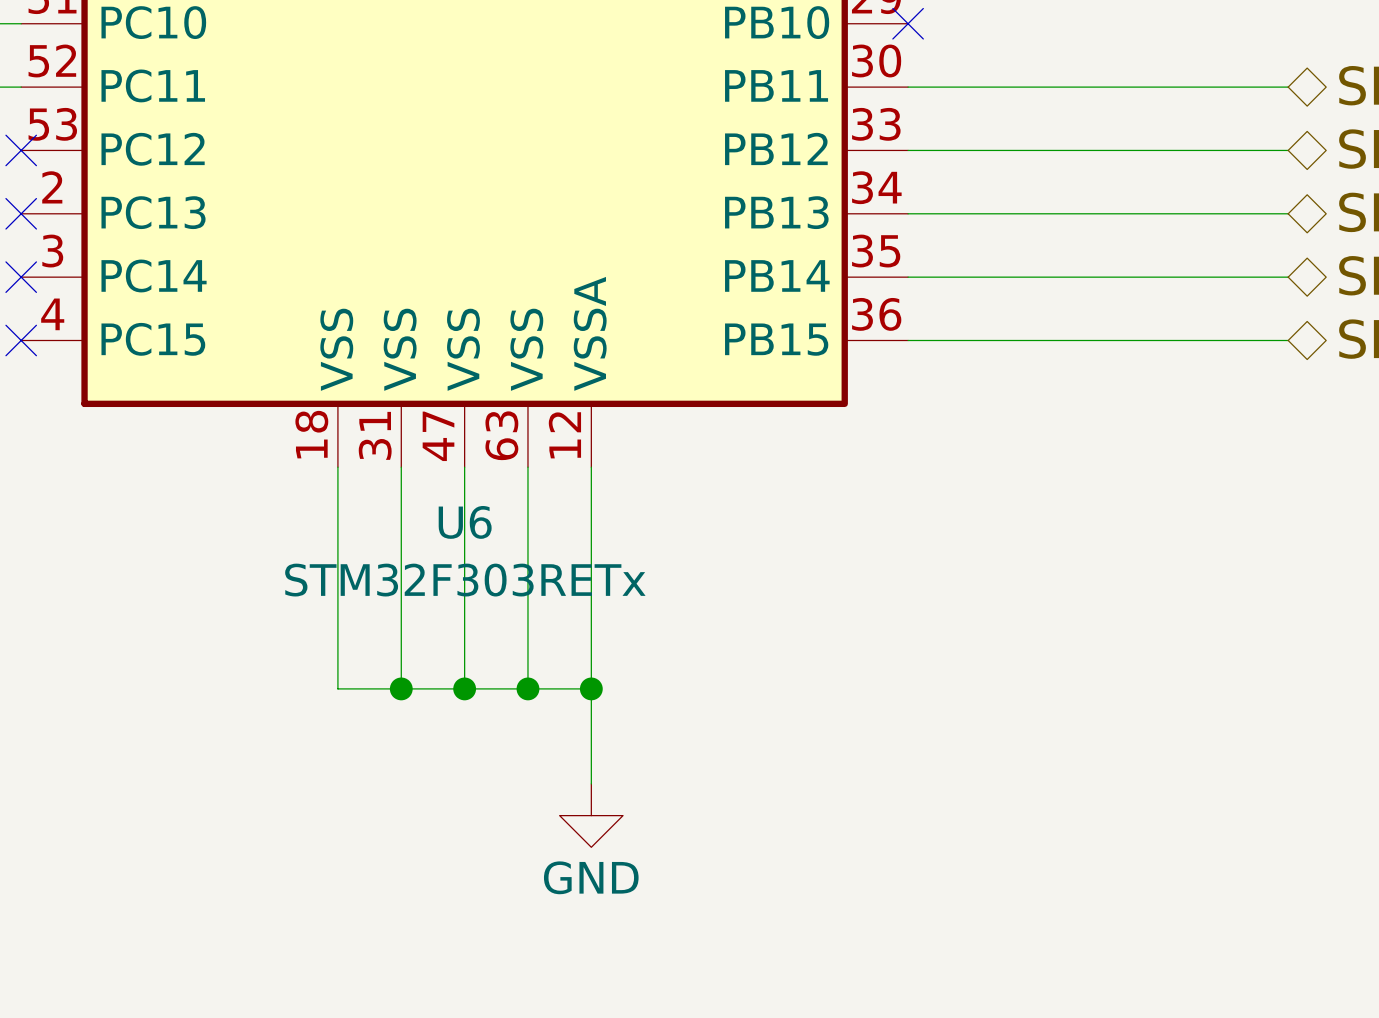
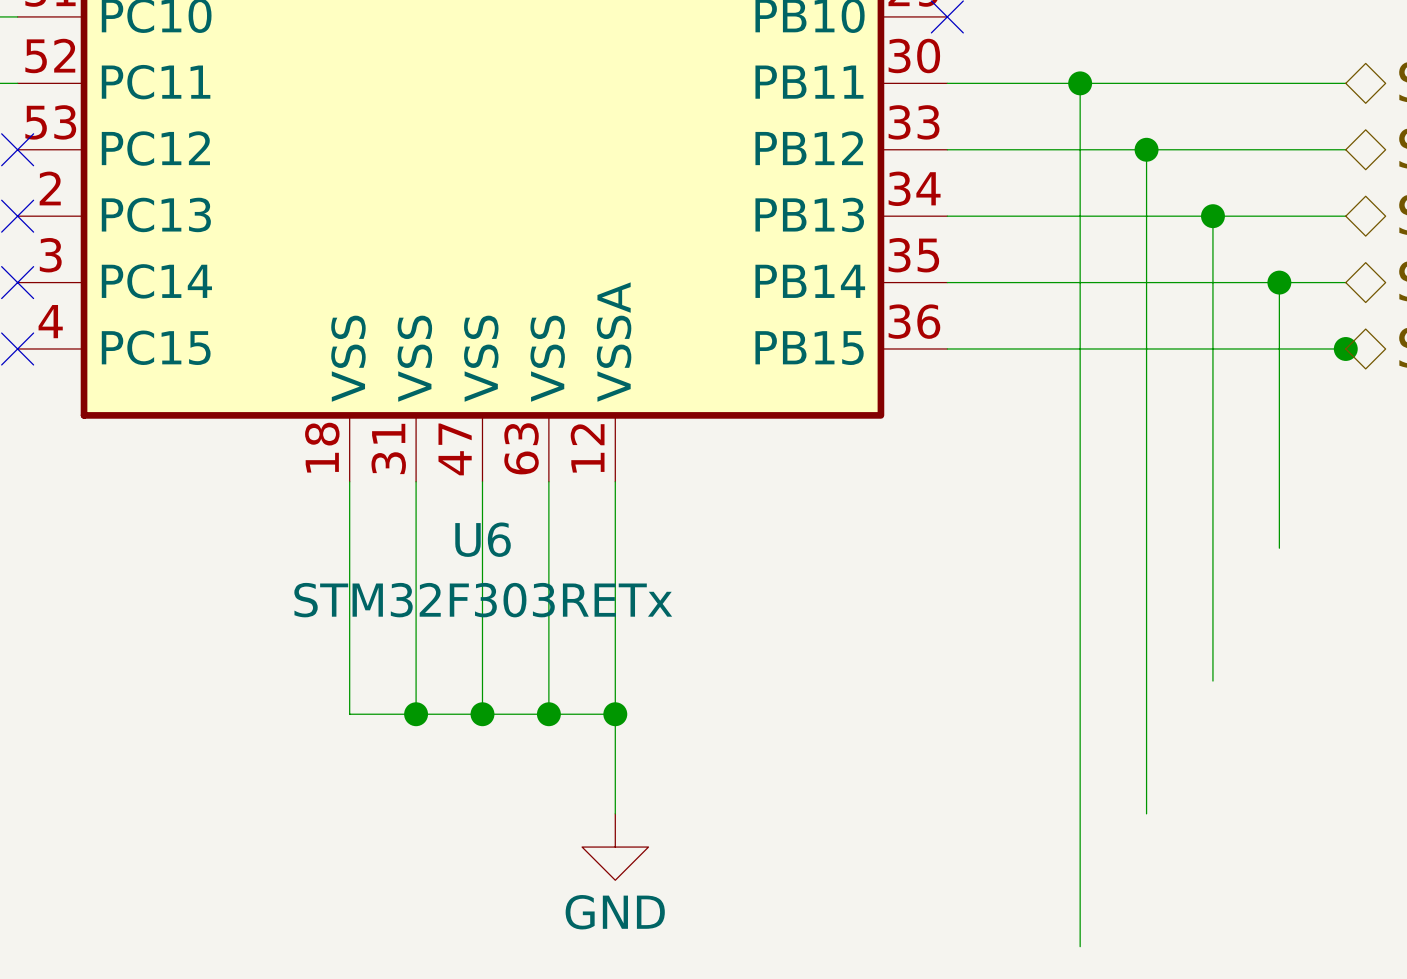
wire: none -> (1080, 83) (1080, 946)
junction: none -> (1080, 83)
wire: none -> (1146, 149) (1146, 813)
junction: none -> (1146, 149)
wire: none -> (1212, 216) (1212, 681)
junction: none -> (1212, 216)
wire: none -> (1279, 282) (1279, 548)
junction: none -> (1279, 282)
junction: none -> (1345, 348)

